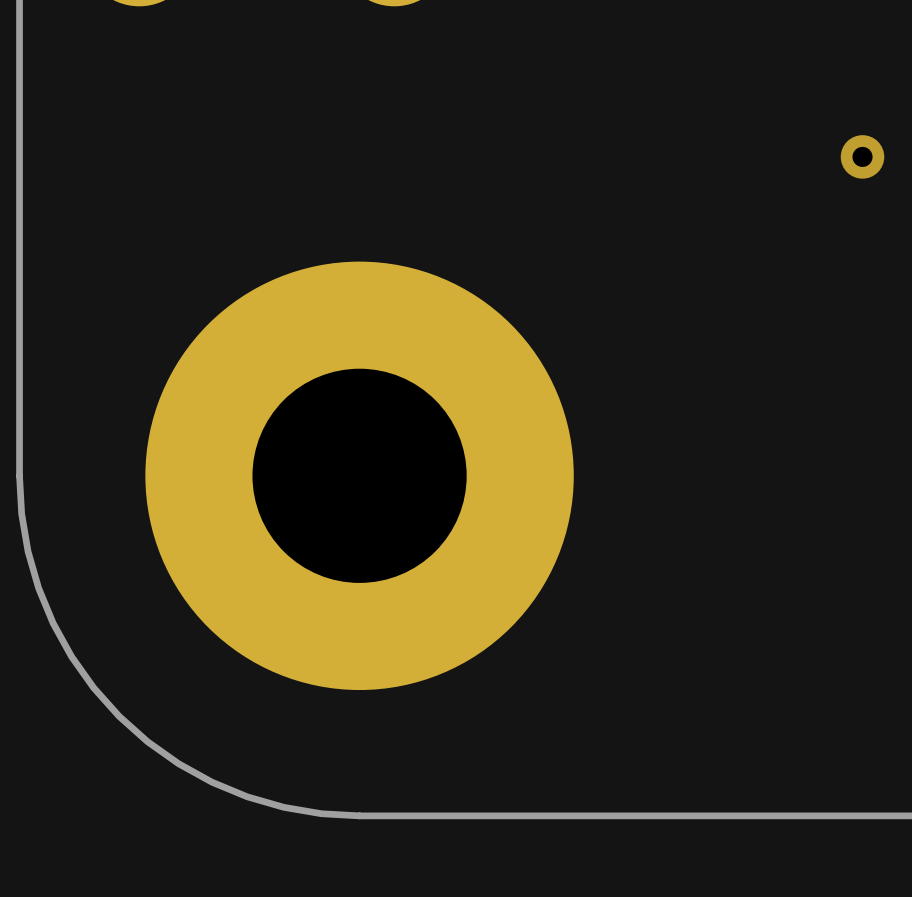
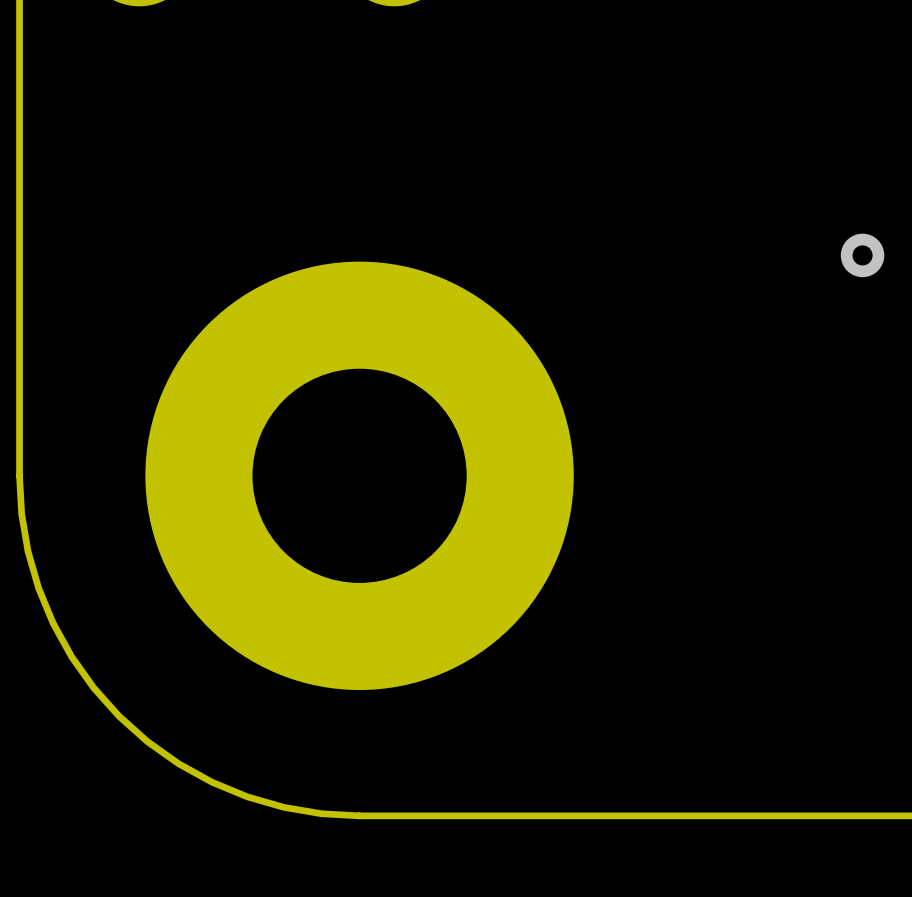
via position: (862, 156) -> (862, 255)

